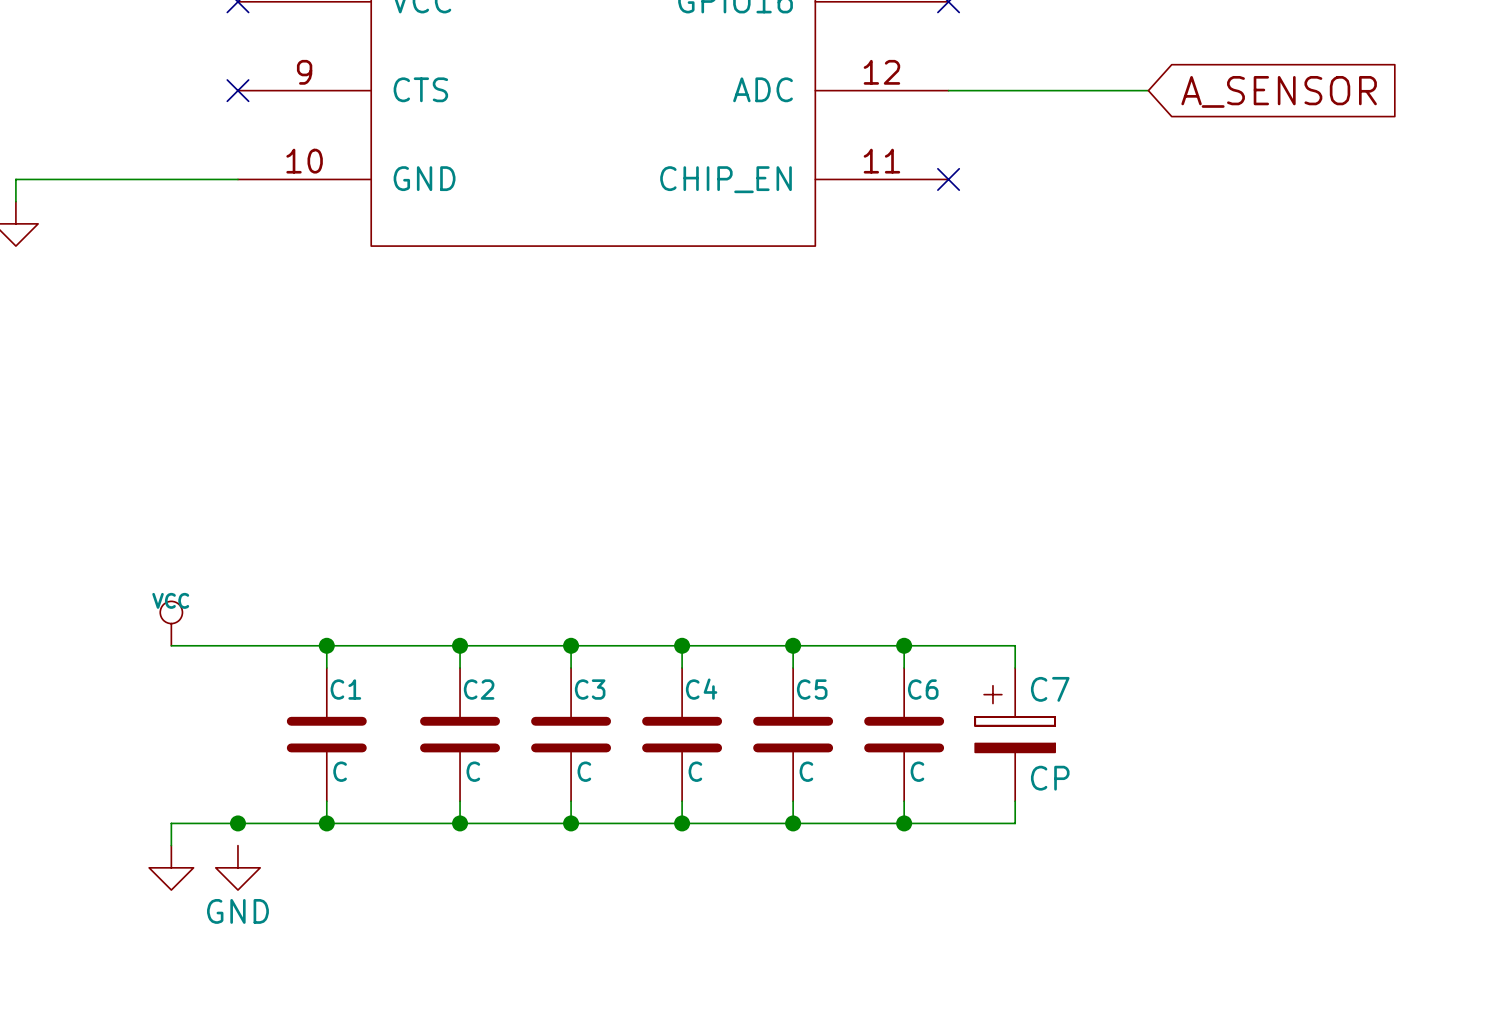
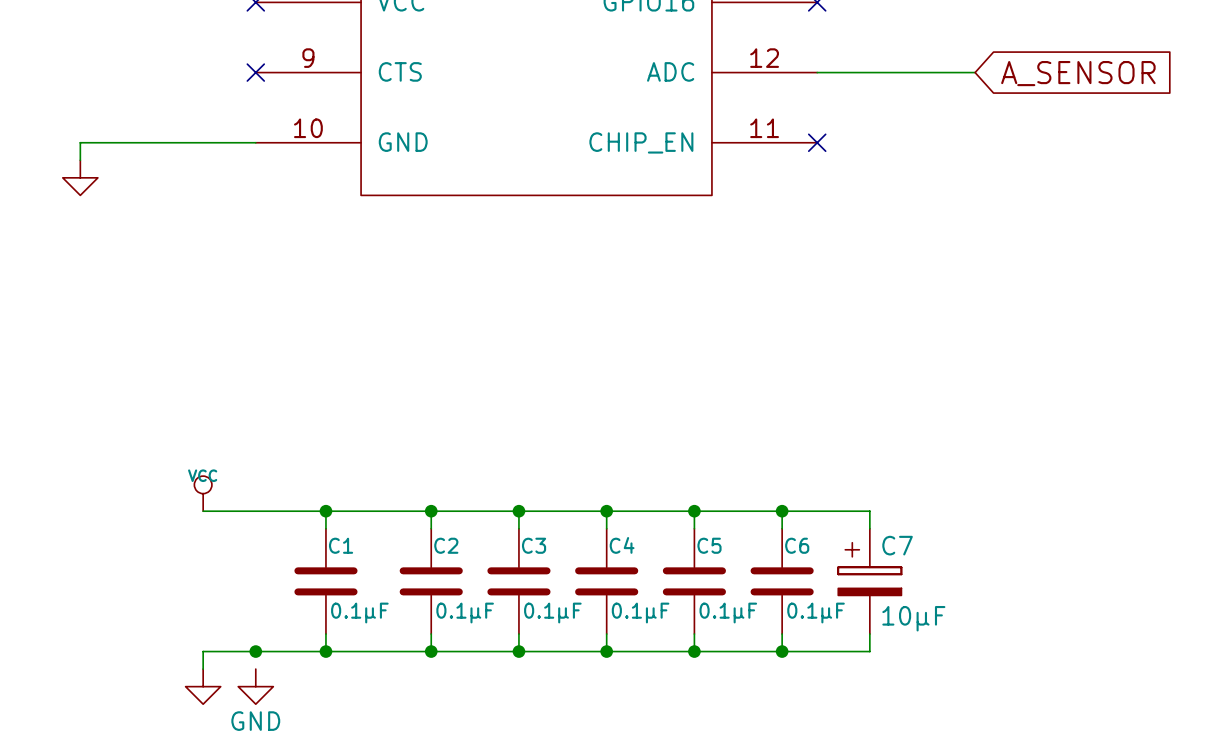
C1 value: C (340, 771) -> 0.1µF (359, 613)
C2 value: C (473, 771) -> 0.1µF (465, 613)
C3 value: C (584, 771) -> 0.1µF (552, 613)
C4 value: C (695, 771) -> 0.1µF (640, 613)
C5 value: C (806, 771) -> 0.1µF (728, 613)
C6 value: C (917, 771) -> 0.1µF (816, 613)
C7 value: CP (1050, 778) -> 10µF (913, 618)

